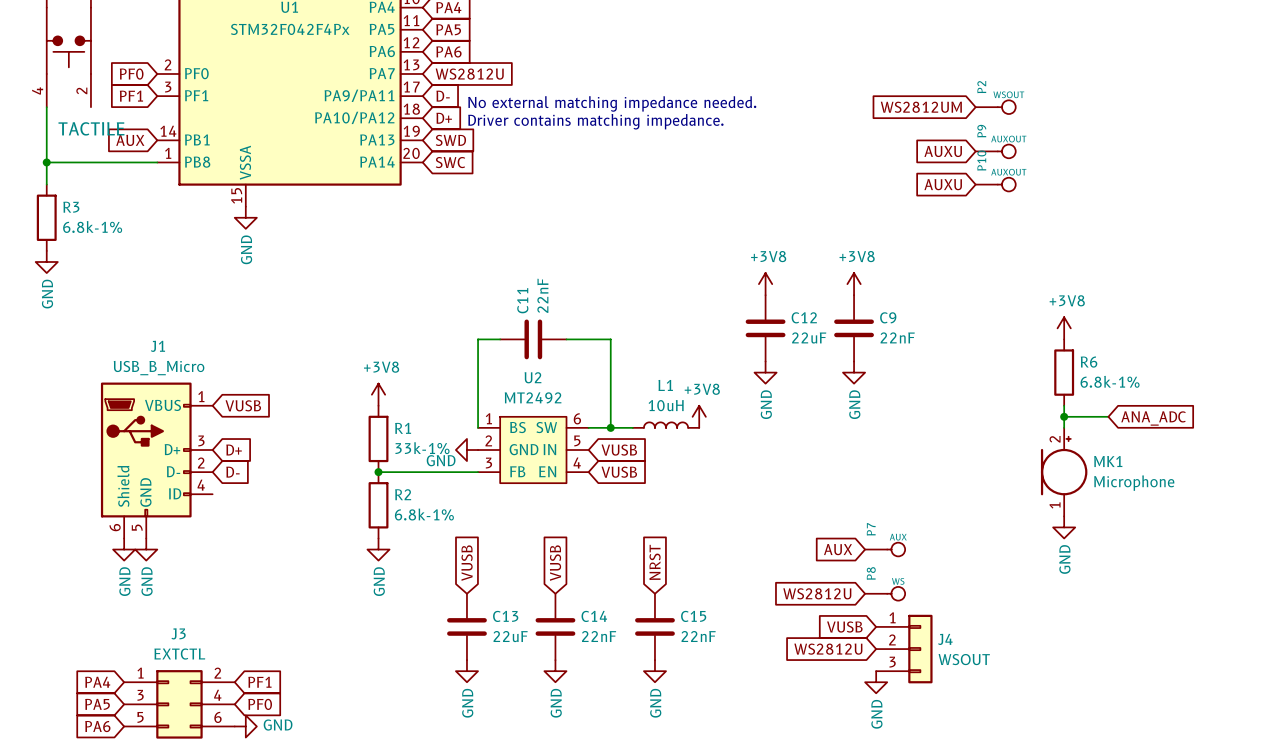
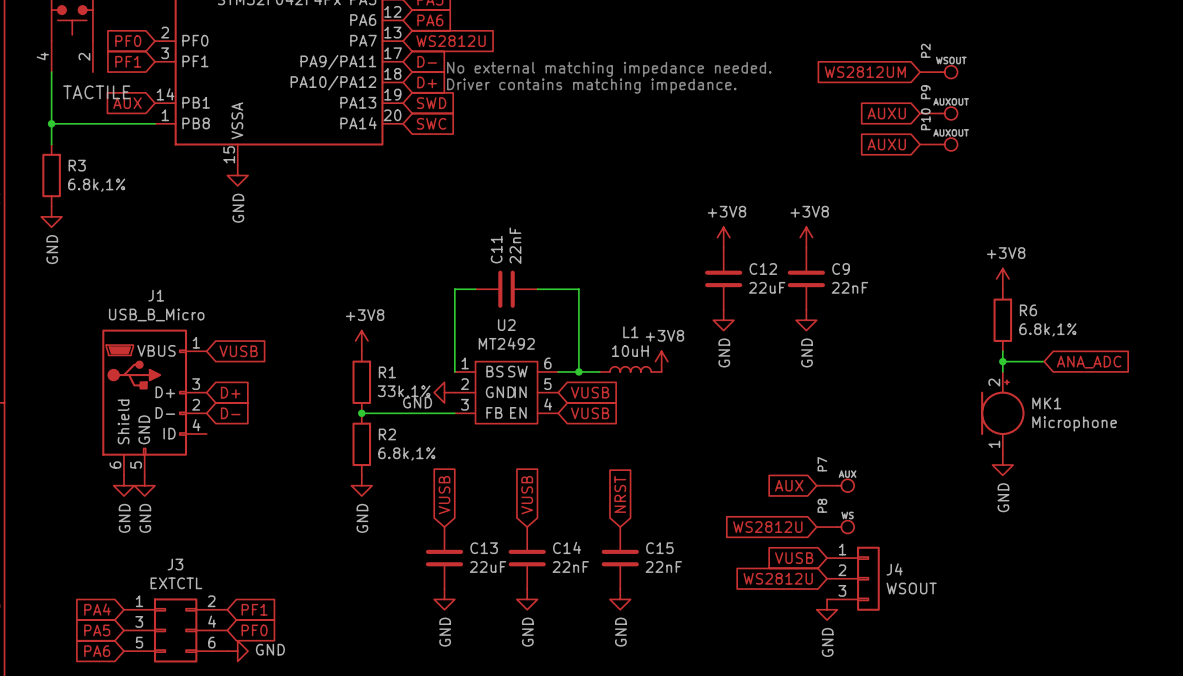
R3 value: 6.8k-1% (92, 227) -> 6.8k,1% (96, 185)
R6 value: 6.8k-1% (1110, 381) -> 6.8k,1% (1047, 329)
R1 value: 33k-1% (422, 448) -> 33k,1% (404, 391)
R2 value: 6.8k-1% (424, 514) -> 6.8k,1% (406, 453)

